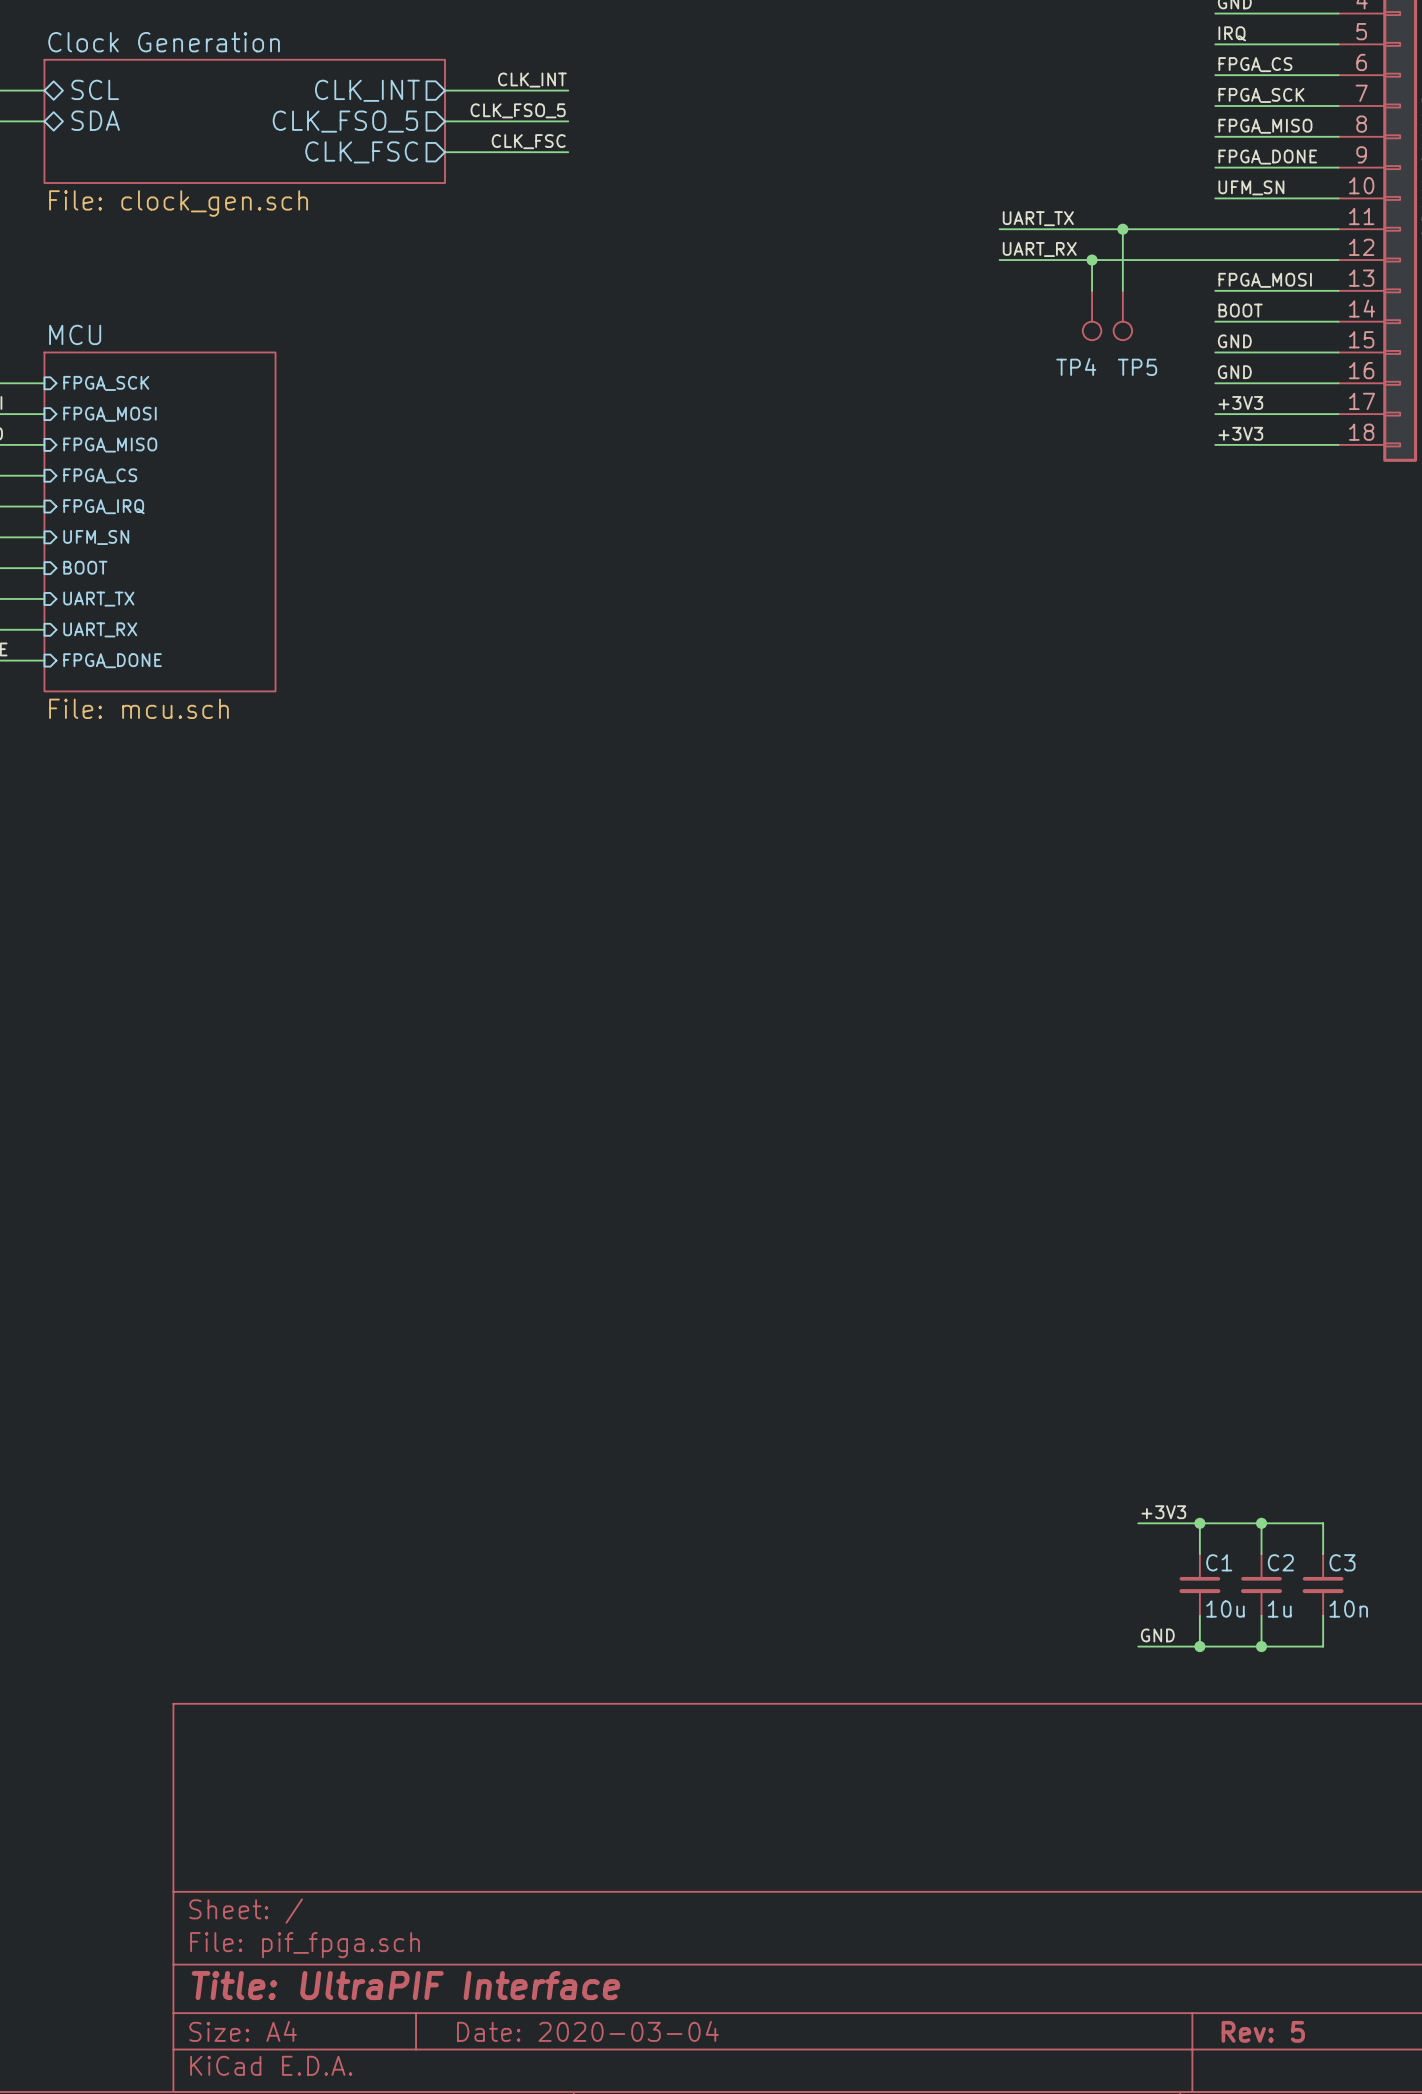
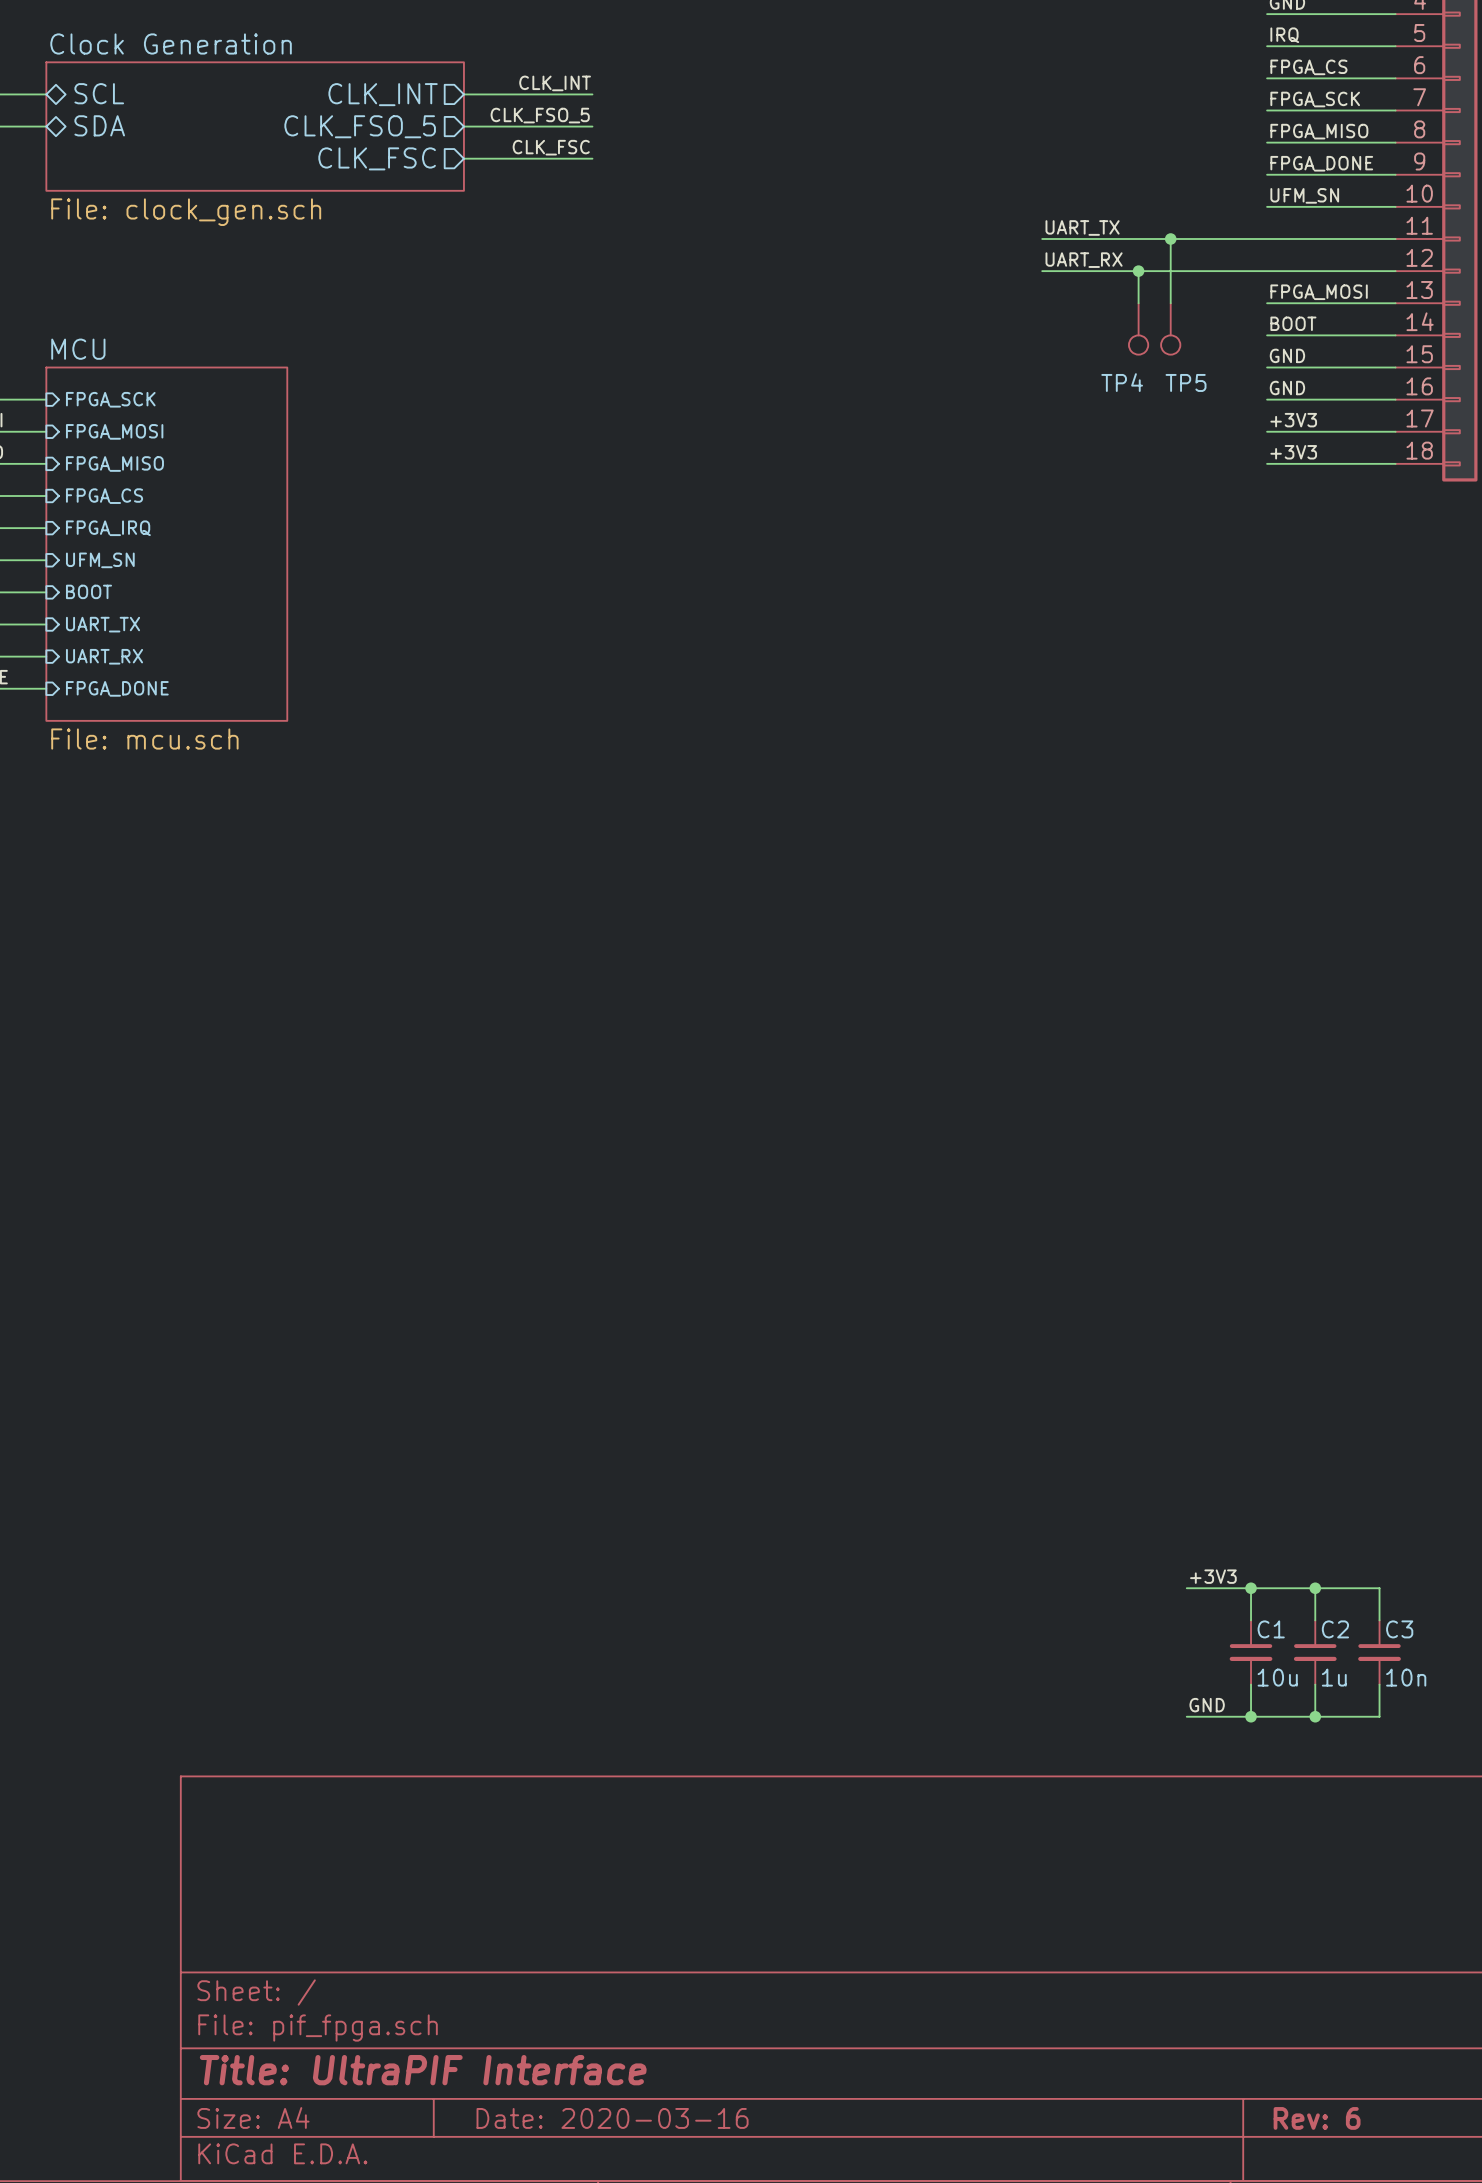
title block: Date: 2020-03-04 (587, 2031) -> Date: 2020-03-16 (612, 2118)
title block: Rev: 5 (1263, 2031) -> Rev: 6 (1317, 2118)

